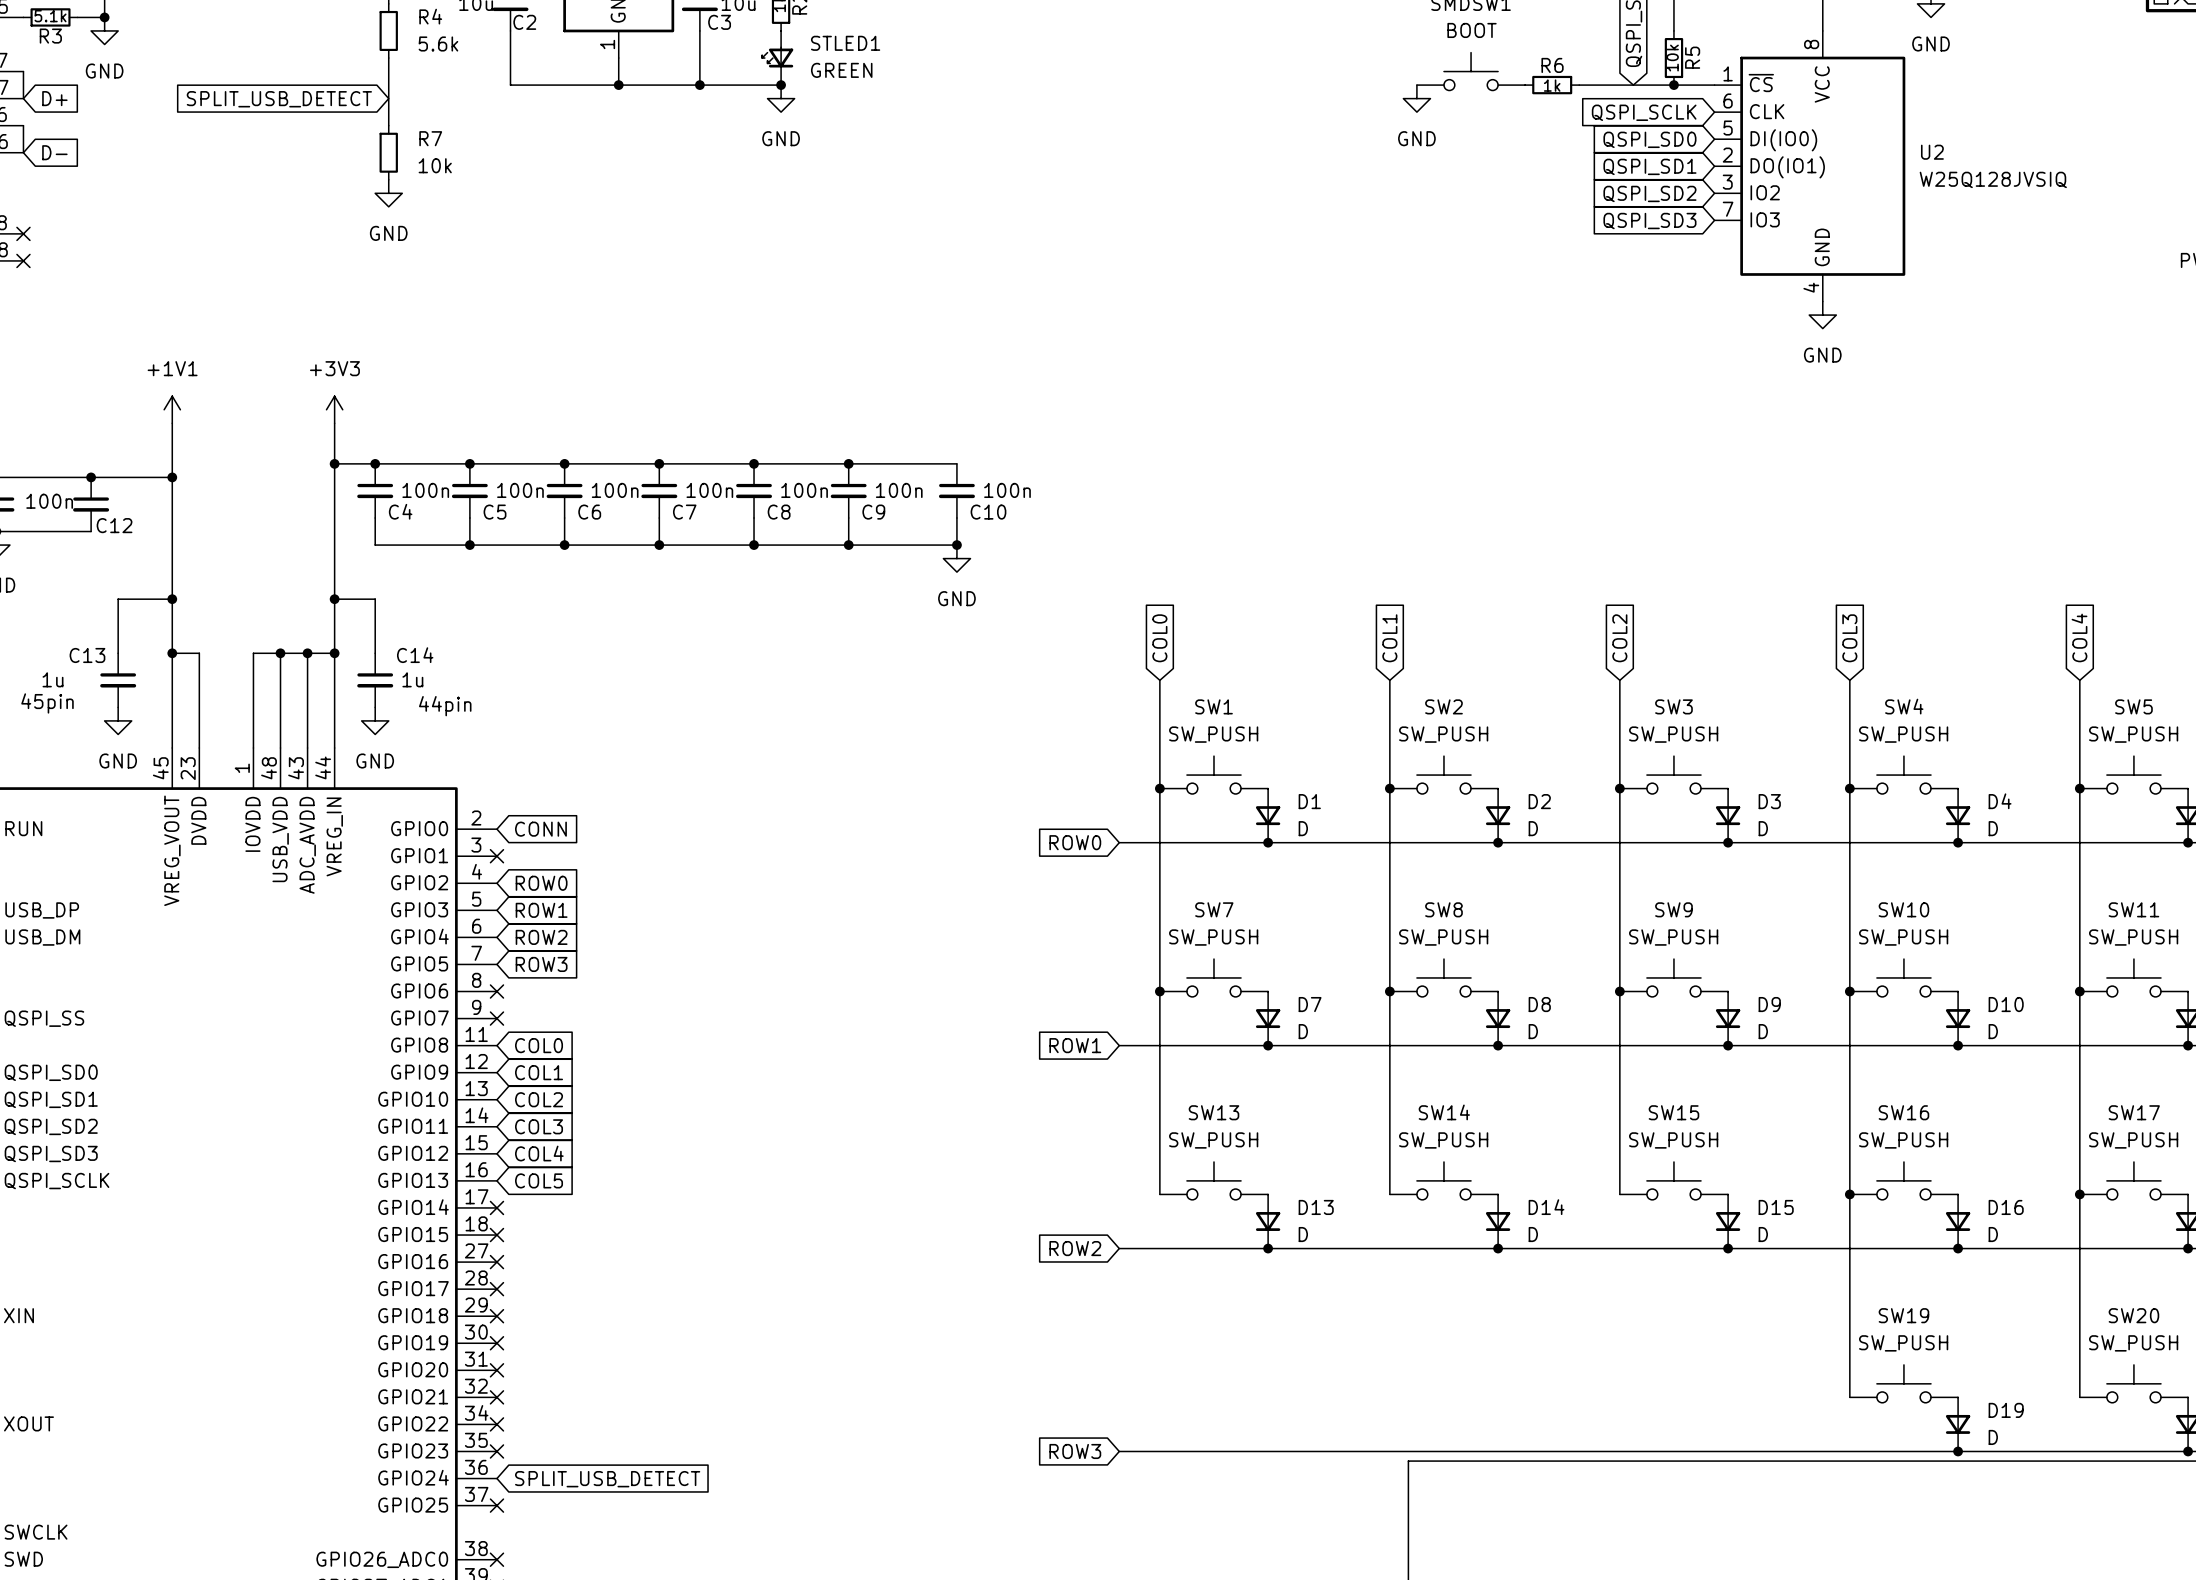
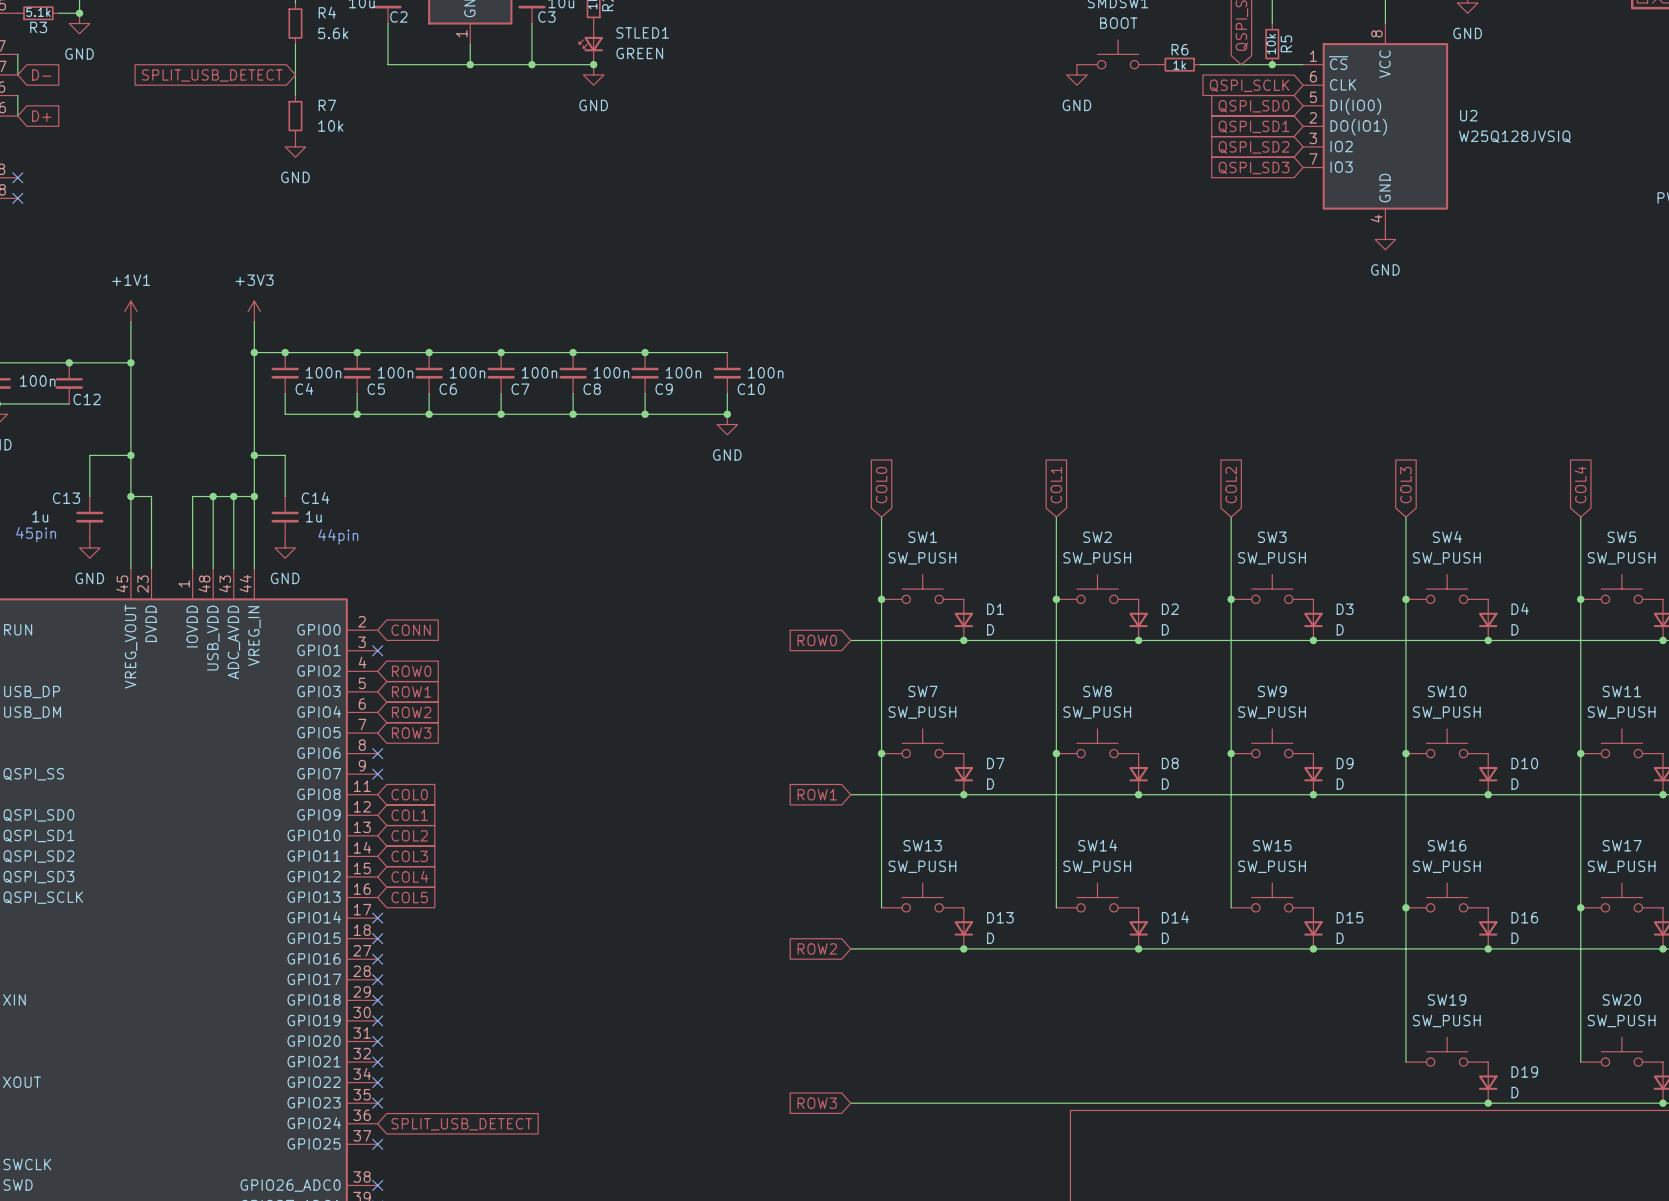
global label: D+ (54, 98) -> D- (41, 74)
global label: D- (54, 152) -> D+ (41, 116)

